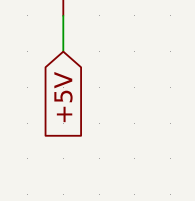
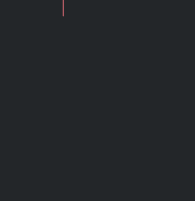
wire: (63, 15) (63, 51) -> none
global label: +5V (63, 97) -> none

